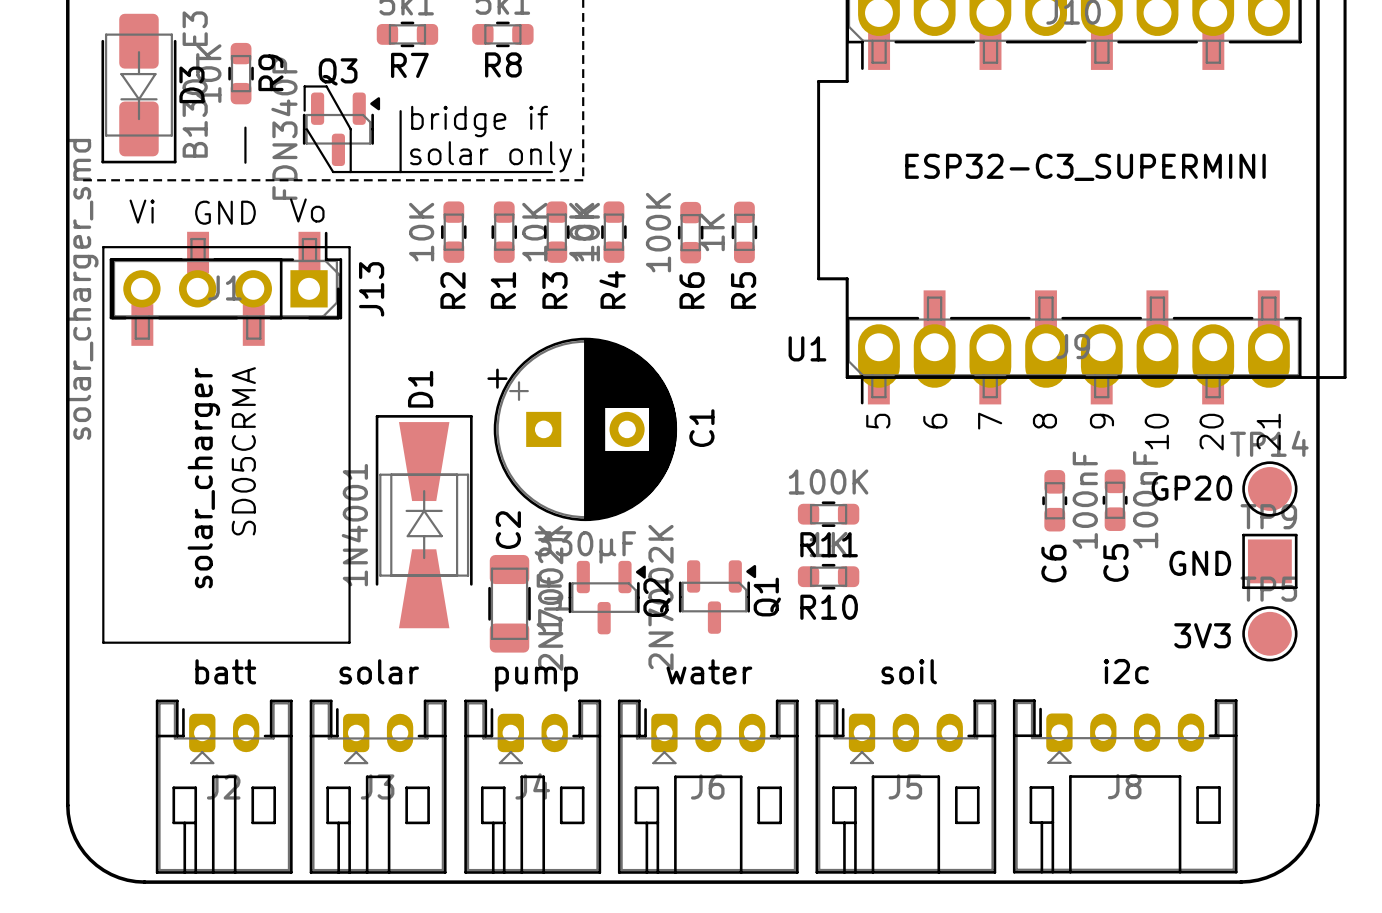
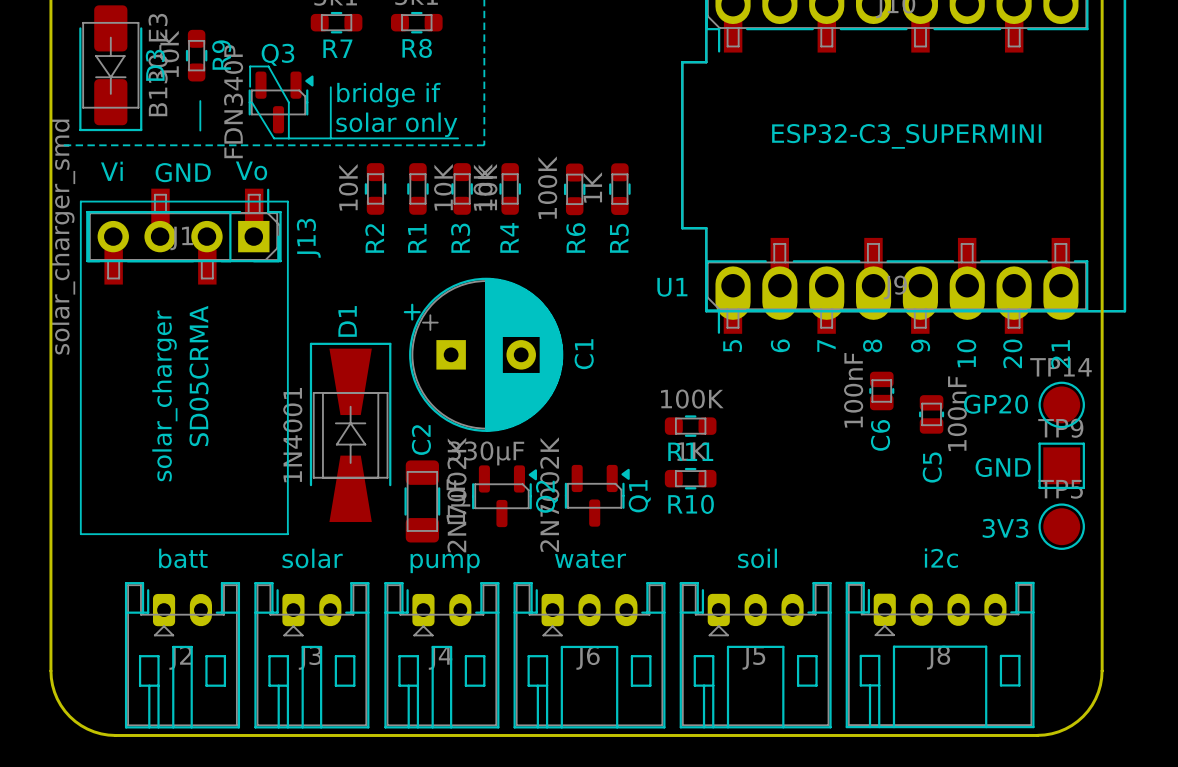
C5 footprint: [1102, 469, 1128, 531] -> [919, 395, 945, 434]
C6 footprint: [1042, 470, 1068, 532] -> [869, 371, 895, 411]
C6 value position: 100nF (1085, 500) -> 100nF (853, 390)

